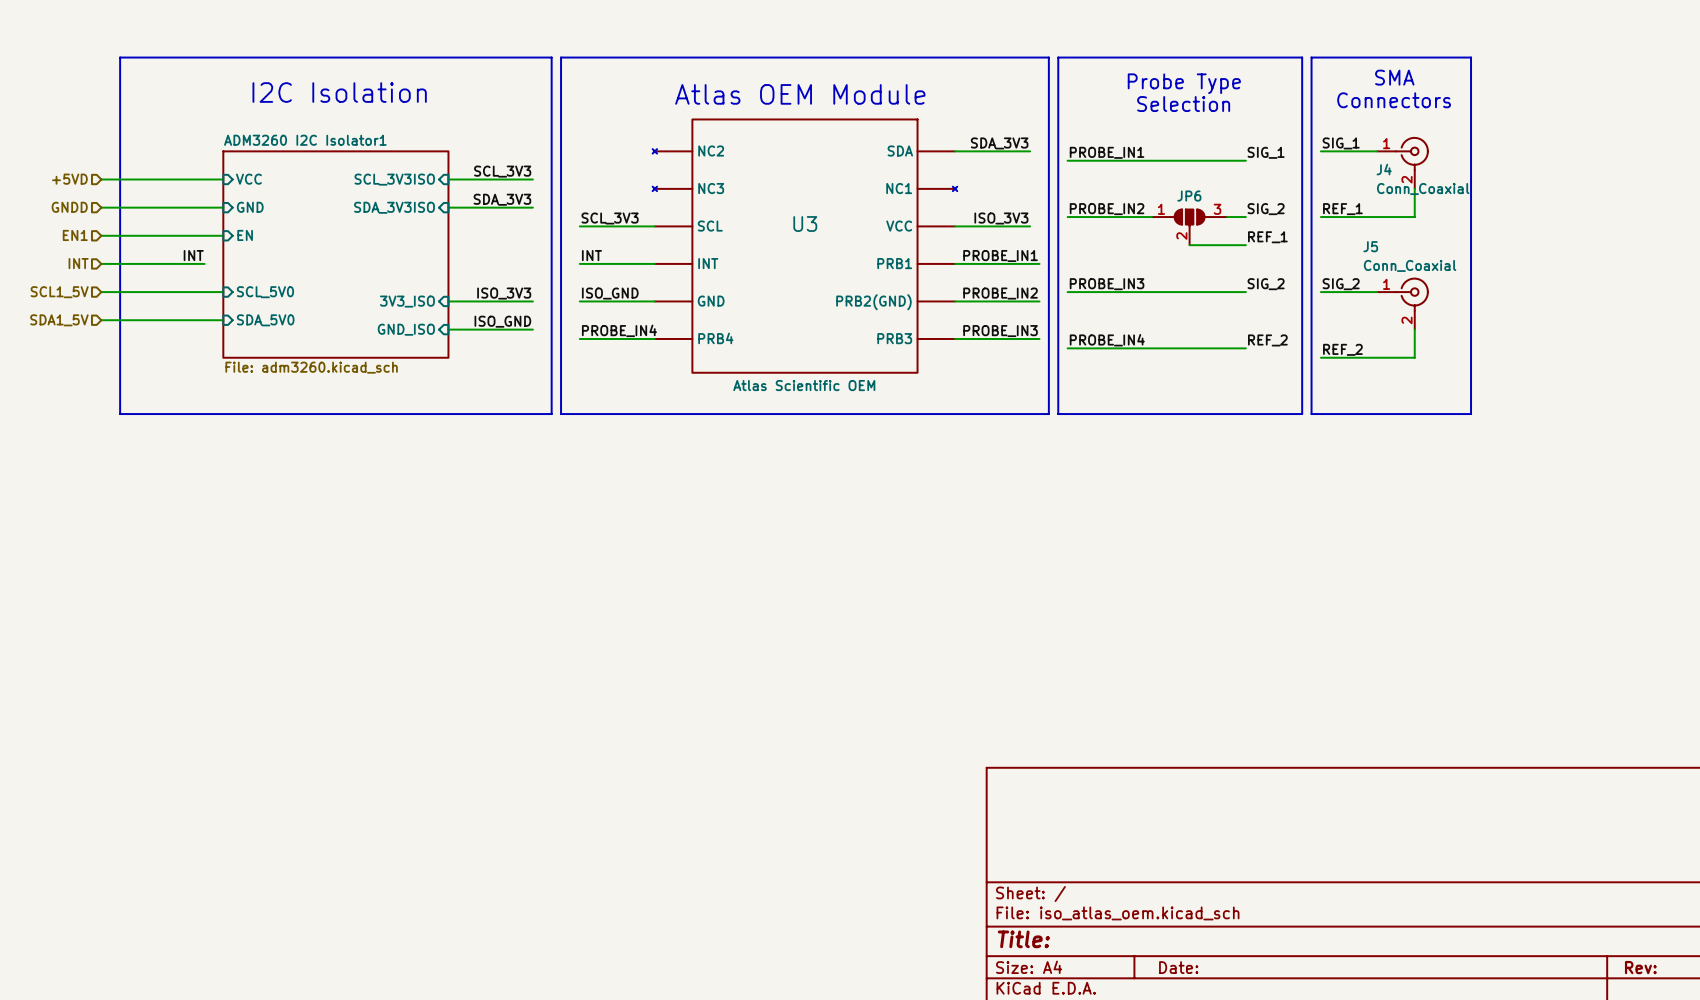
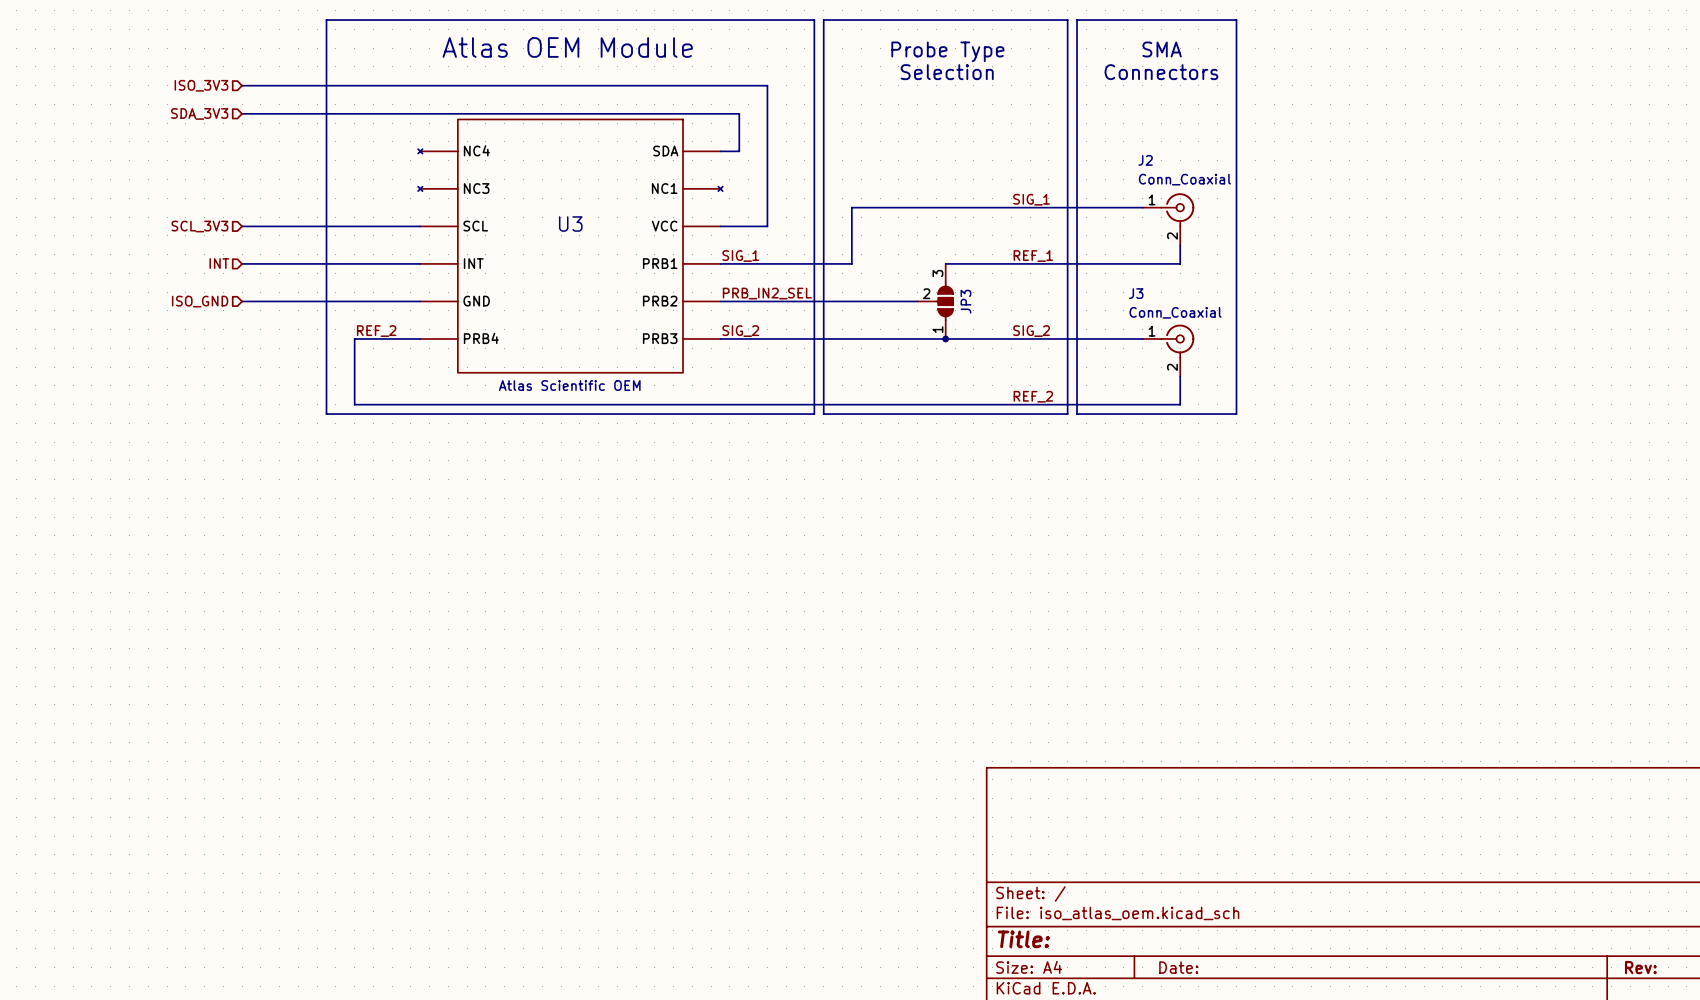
text: none -> Atlas OEM Module (567, 47)
text: none -> SMA (1162, 49)
text: none -> Probe Type (947, 51)
line: (1311, 57) (1471, 57) (1471, 414) (1311, 414) (1311, 57) -> none
text: none -> Selection (947, 72)
text: none -> Connectors (1161, 72)
text: SMA (1394, 77) -> none
text: Probe Type (1184, 83) -> none
hierarchical label: none -> ISO_3V3 (201, 85)
wire: none -> (242, 85) (767, 85) (767, 226) (720, 226)
text: I2C Isolation (339, 92) -> none
text: Atlas OEM Module (800, 94) -> none
text: Connectors (1394, 100) -> none
text: Selection (1183, 104) -> none
hierarchical label: none -> SDA_3V3 (199, 113)
wire: none -> (242, 113) (739, 113) (739, 151) (720, 151)
label: SDA_3V3 (999, 143) -> none
label: SIG_1 (1341, 143) -> none
U3 pin name: NC2 (711, 151) -> NC4 (476, 150)
wire: (955, 151) (1030, 151) -> none
wire: (1320, 151) (1377, 151) -> none
label: PROBE_IN1 (1107, 152) -> none
label: SIG_1 (1266, 152) -> none
wire: (1067, 160) (1245, 160) -> none
J4: Conn_Coaxial (1403, 162) -> none
label: SCL_3V3 (502, 171) -> none
hierarchical label: +5VD (69, 179) -> none
wire: (101, 179) (223, 179) -> none
sheet pin: VCC (248, 179) -> none
sheet pin: SCL_3V3ISO (394, 179) -> none
wire: (448, 179) (532, 179) -> none
wire: (1414, 188) (1414, 217) (1320, 217) -> none
label: SDA_3V3 (502, 199) -> none
label: none -> SIG_1 (1031, 199)
hierarchical label: GNDD (69, 207) -> none
wire: (101, 207) (223, 207) -> none
sheet pin: GND (250, 207) -> none
sheet pin: SDA_3V3ISO (394, 207) -> none
wire: (448, 207) (532, 207) -> none
wire: none -> (1142, 207) (851, 207) (851, 263) (720, 263)
label: PROBE_IN2 (1107, 209) -> none
label: SIG_2 (1266, 209) -> none
label: REF_1 (1342, 209) -> none
wire: (1067, 217) (1152, 217) -> none
wire: (1227, 217) (1245, 217) -> none
label: SCL_3V3 (610, 218) -> none
label: ISO_3V3 (1001, 218) -> none
J2: none -> Conn_Coaxial (1168, 219)
hierarchical label: none -> SCL_3V3 (199, 226)
wire: none -> (242, 226) (420, 226)
wire: (579, 226) (654, 226) -> none
wire: (955, 226) (1030, 226) -> none
JP6: (1189, 227) -> none
hierarchical label: EN1 (75, 235) -> none
wire: (101, 235) (223, 235) -> none
sheet pin: EN (245, 235) -> none
label: REF_1 (1267, 237) -> none
wire: none -> (1180, 245) (1180, 263) (1039, 263)
wire: (1189, 245) (1245, 245) -> none
U3 position: (804, 246) -> (570, 246)
sheet ADM3260 I2C Isolator1: File: adm3260.kicad_sch (335, 254) -> none
label: INT (193, 255) -> none
label: INT (591, 255) -> none
label: none -> SIG_1 (740, 256)
label: PROBE_IN1 (1000, 256) -> none
label: none -> REF_1 (1033, 256)
hierarchical label position: INT (78, 263) -> INT (219, 263)
wire: (101, 263) (204, 263) -> none
wire: none -> (242, 263) (420, 263)
wire: (579, 263) (654, 263) -> none
label: PROBE_IN3 (1107, 284) -> none
label: SIG_2 (1266, 284) -> none
label: SIG_2 (1341, 284) -> none
hierarchical label: SCL1_5V (59, 292) -> none
wire: (101, 292) (223, 292) -> none
sheet pin: SCL_5V0 (265, 292) -> none
wire: (1067, 292) (1245, 292) -> none
wire: (1320, 292) (1377, 292) -> none
label: ISO_3V3 (504, 293) -> none
label: ISO_GND (610, 293) -> none
label: none -> PRB_IN2_SEL (767, 293)
label: PROBE_IN2 (1000, 293) -> none
hierarchical label: none -> ISO_GND (200, 301)
wire: none -> (242, 301) (420, 301)
sheet pin: 3V3_ISO (407, 301) -> none
wire: (448, 301) (532, 301) -> none
wire: (579, 301) (654, 301) -> none
wire: none -> (720, 301) (917, 301)
JP3: none -> (935, 301)
wire: (955, 301) (1039, 301) -> none
U3 pin name: PRB2(GND) (873, 302) -> PRB2 (660, 301)
J5: Conn_Coaxial (1403, 303) -> none
hierarchical label: SDA1_5V (59, 320) -> none
wire: (101, 320) (223, 320) -> none
sheet pin: SDA_5V0 (265, 320) -> none
label: ISO_GND (502, 321) -> none
sheet pin: GND_ISO (406, 329) -> none
wire: (448, 329) (532, 329) -> none
wire: (1414, 329) (1414, 357) (1320, 357) -> none
label: PROBE_IN4 (619, 330) -> none
label: none -> REF_2 (376, 331)
label: none -> SIG_2 (740, 331)
label: PROBE_IN3 (1000, 331) -> none
label: none -> SIG_2 (1031, 331)
wire: none -> (420, 338) (354, 338) (354, 404) (1180, 404) (1180, 376)
wire: (579, 338) (654, 338) -> none
wire: none -> (720, 338) (955, 338)
junction: none -> (945, 338)
wire: none -> (1039, 338) (1142, 338)
label: PROBE_IN4 (1107, 340) -> none
label: REF_2 (1267, 340) -> none
wire: (1067, 348) (1245, 348) -> none
label: REF_2 (1342, 349) -> none
J3: none -> Conn_Coaxial (1168, 350)
label: none -> REF_2 (1033, 396)
line: (326, 414) (120, 414) (120, 57) (551, 57) (551, 414) -> (561, 414) (551, 414)
line: (561, 414) (561, 57) (1048, 57) (1048, 414) -> (1058, 414) (1048, 414)
line: (814, 414) (823, 414) -> (814, 414) (814, 20) (326, 20) (326, 414)
line: (1058, 414) (1058, 57) (1302, 57) (1302, 414) (1236, 414) -> (1077, 414) (1077, 20) (1236, 20) (1236, 414)
line: (1067, 414) (1077, 414) -> (1067, 414) (1067, 20) (823, 20) (823, 414)

